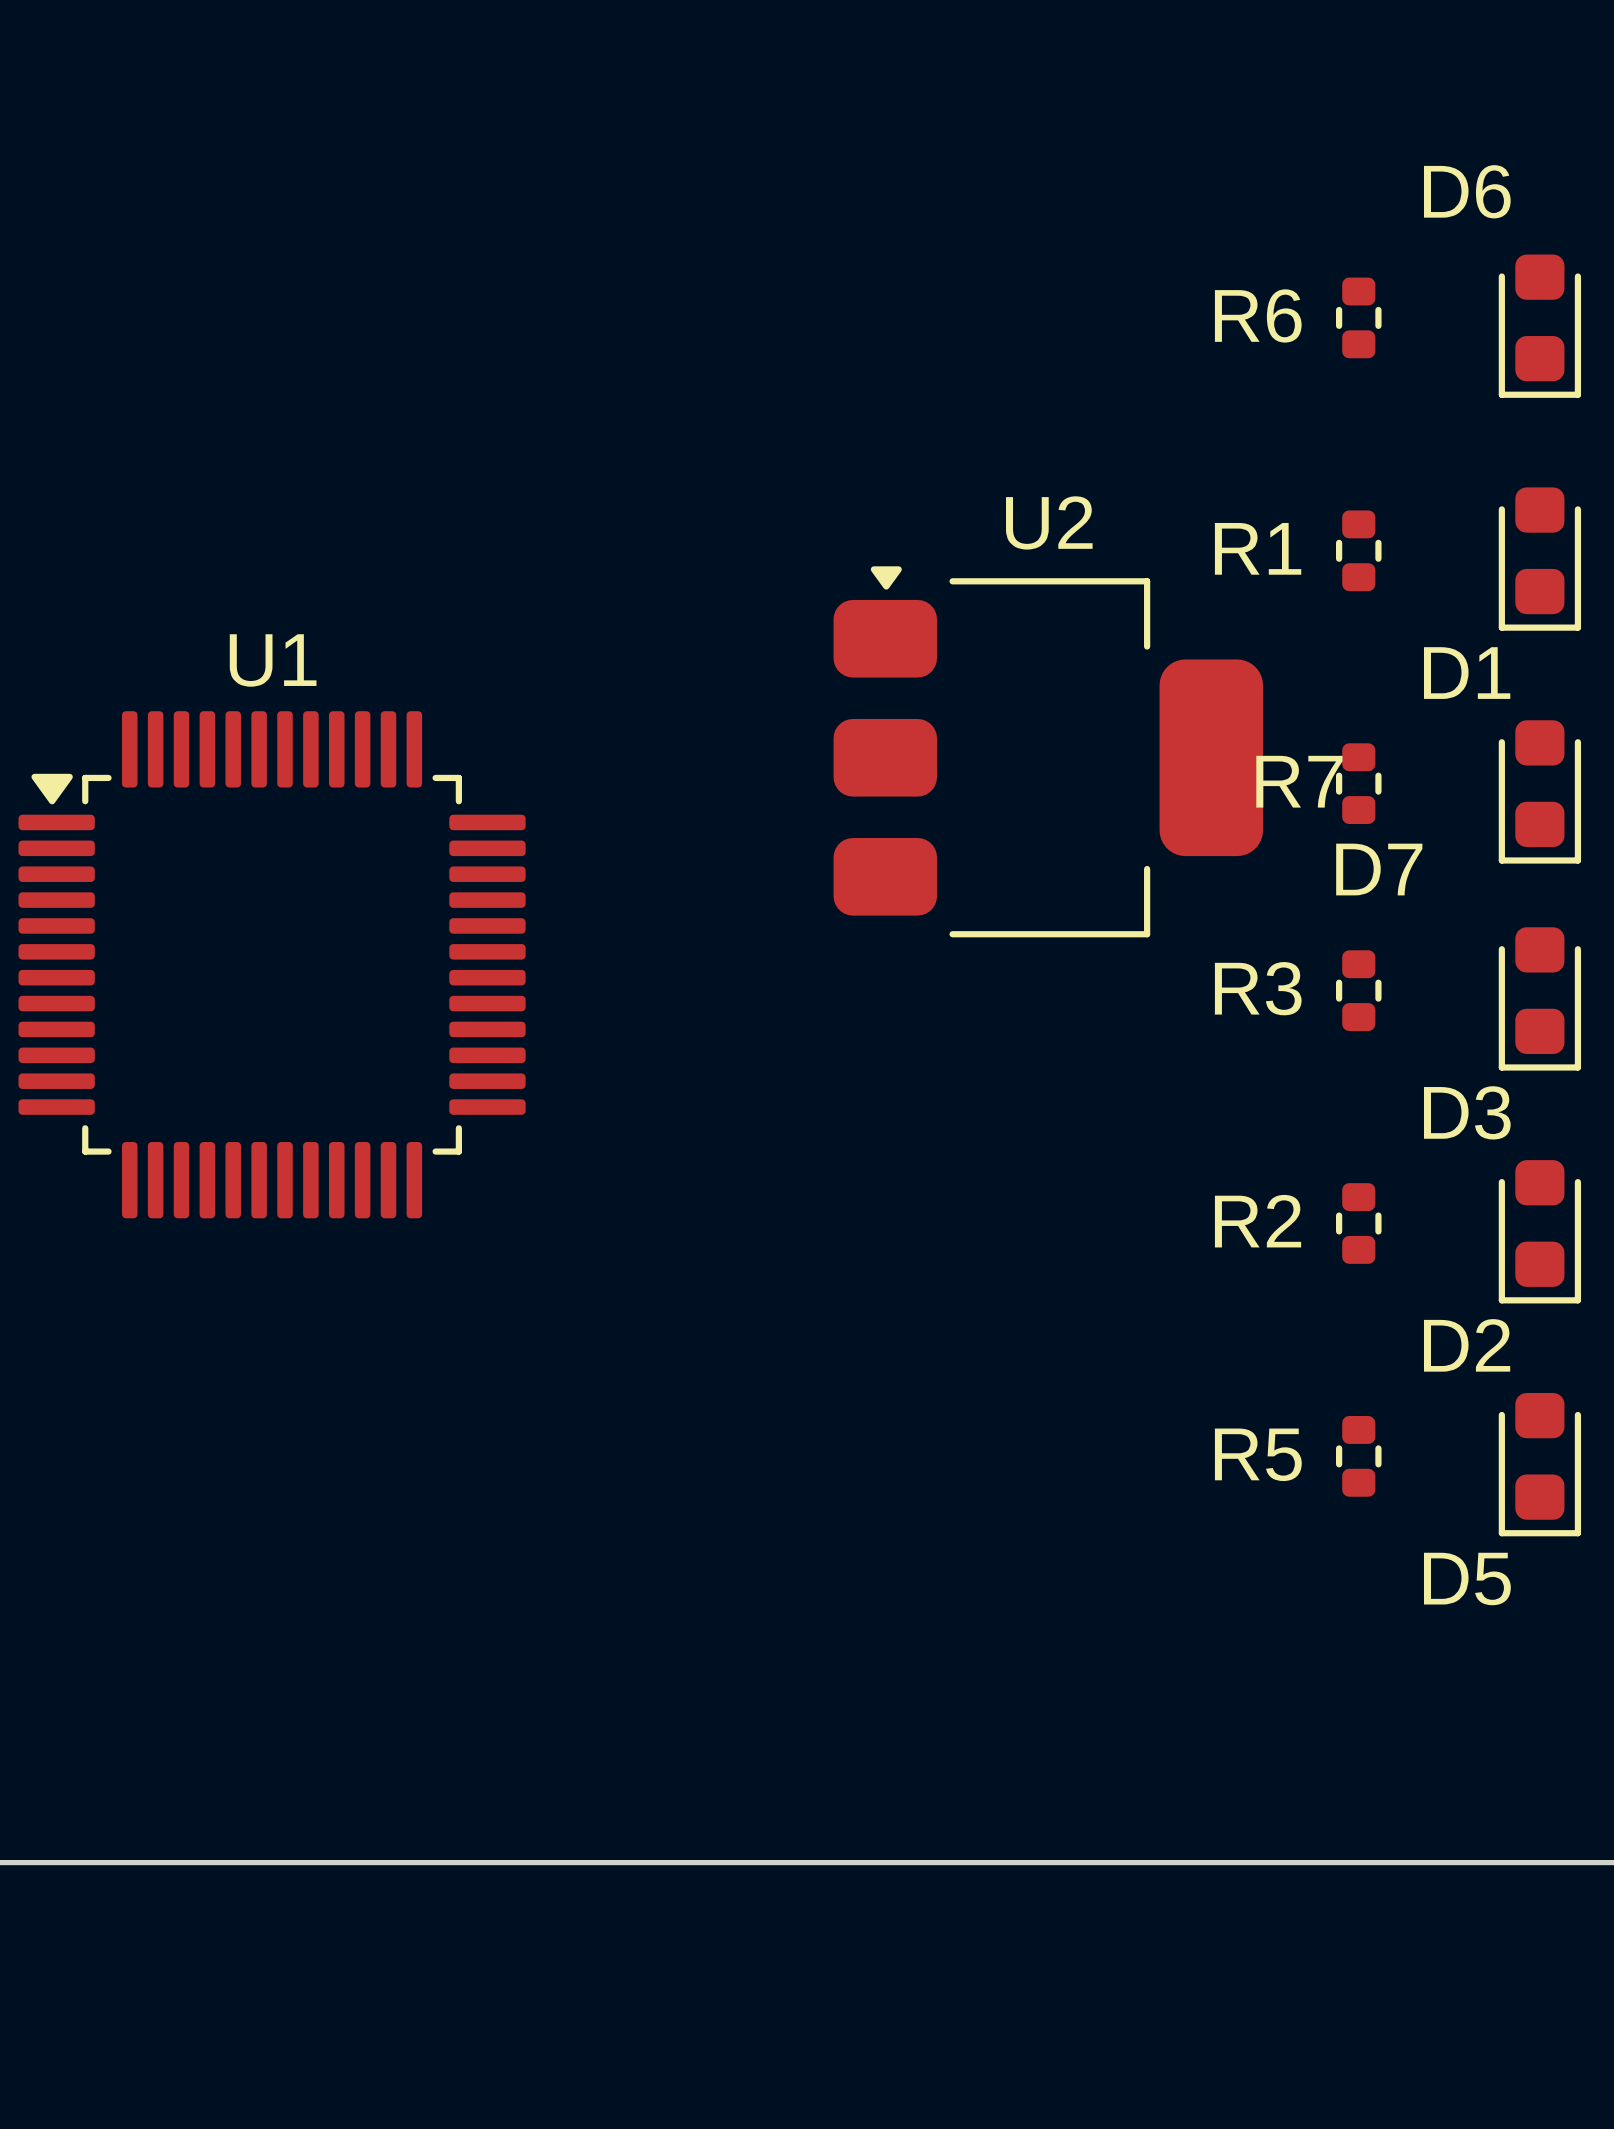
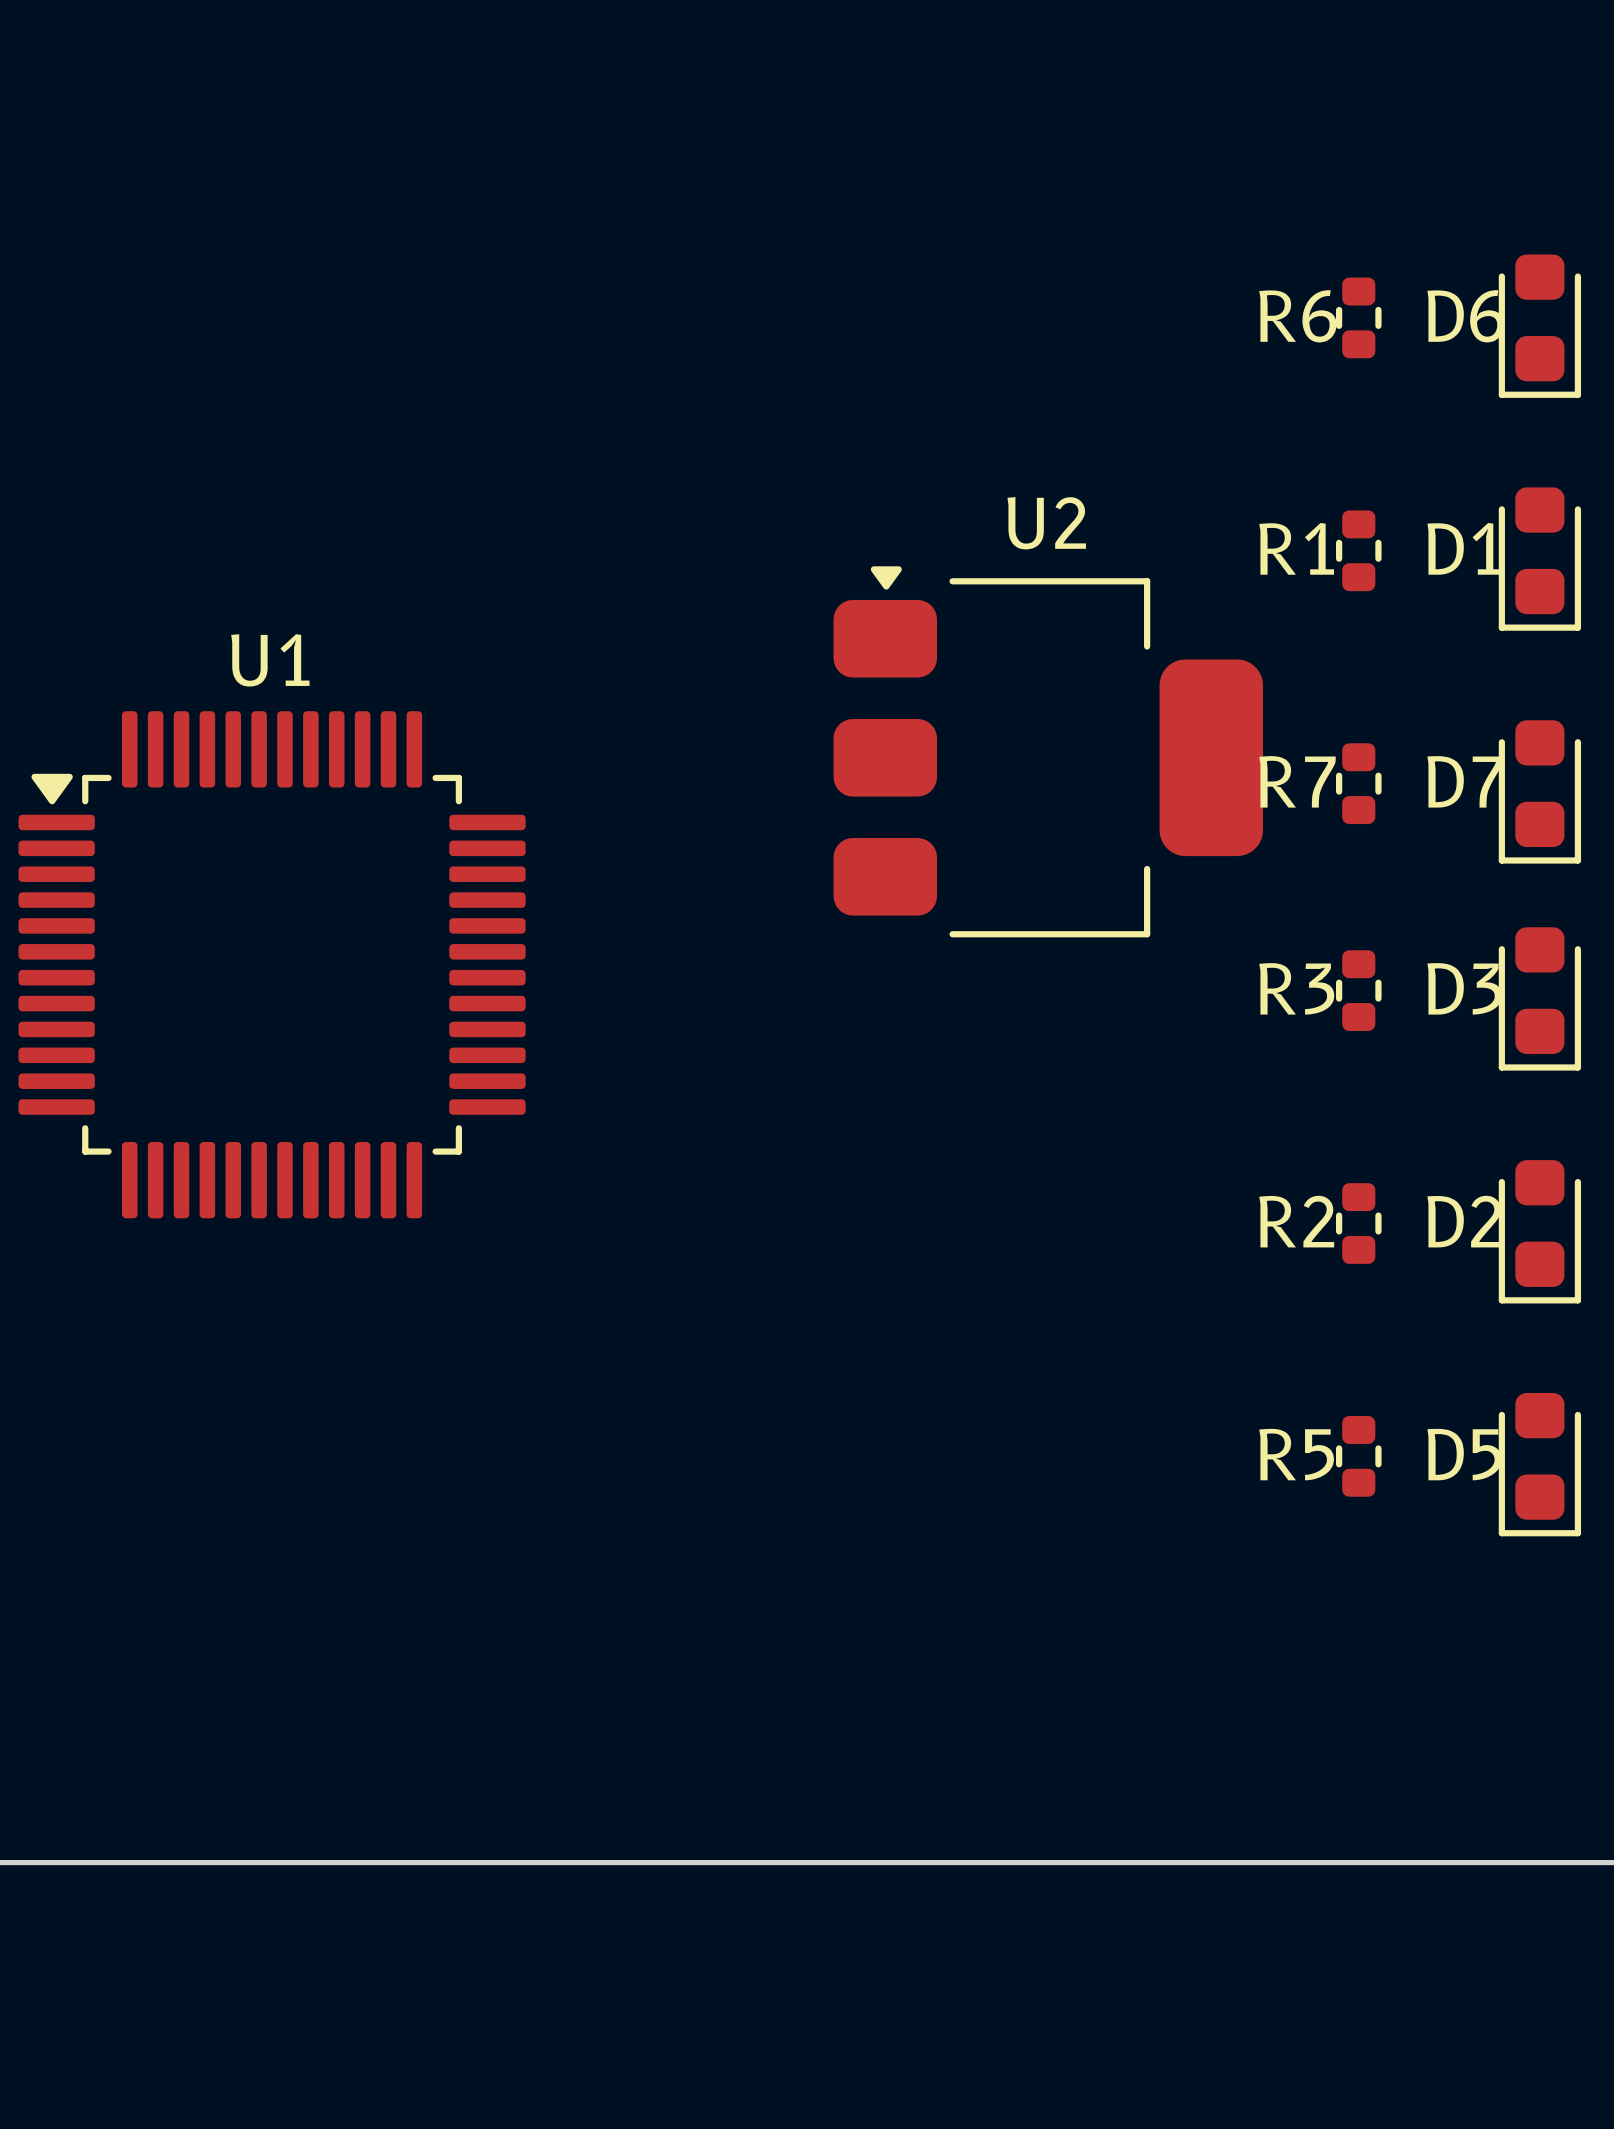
D6 name position: D6 (1467, 191) -> D6 (1465, 316)
R6 name position: R6 (1258, 315) -> R6 (1297, 316)
R1 name position: R1 (1258, 548) -> R1 (1296, 548)
D1 name position: D1 (1467, 673) -> D1 (1464, 548)
D7 name position: D7 (1379, 869) -> D7 (1465, 781)
R3 name position: R3 (1258, 988) -> R3 (1296, 988)
D3 name position: D3 (1467, 1112) -> D3 (1464, 988)
R2 name position: R2 (1258, 1221) -> R2 (1296, 1221)
D2 name position: D2 (1467, 1345) -> D2 (1464, 1221)
R5 name position: R5 (1258, 1454) -> R5 (1296, 1454)
D5 name position: D5 (1467, 1579) -> D5 (1464, 1454)

